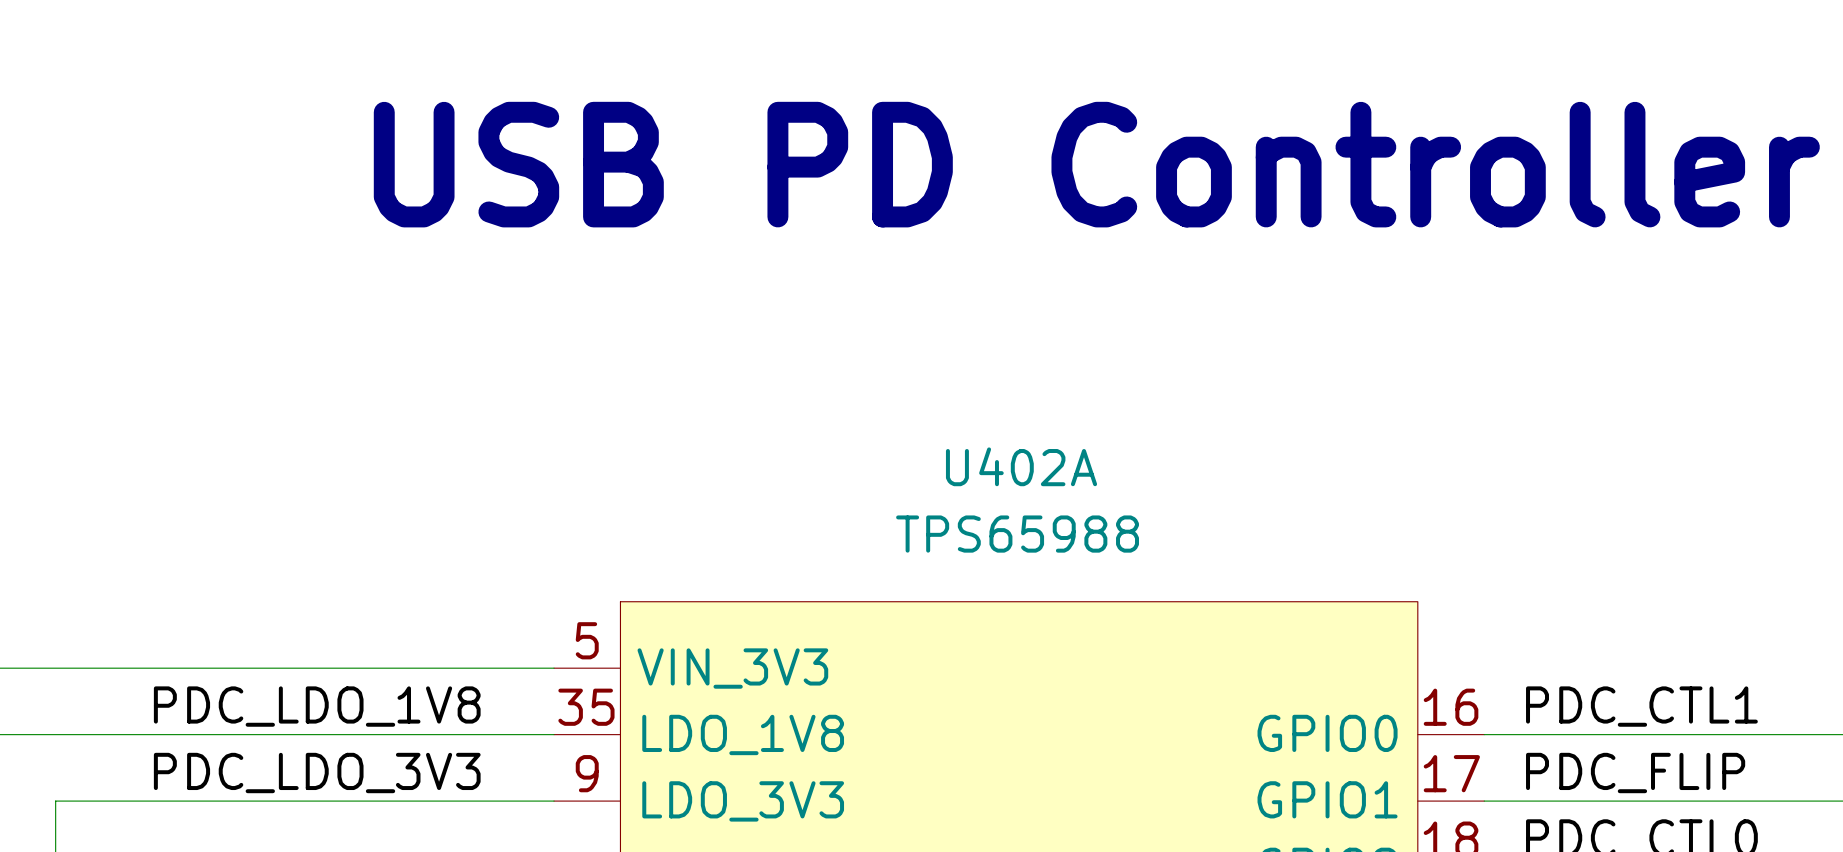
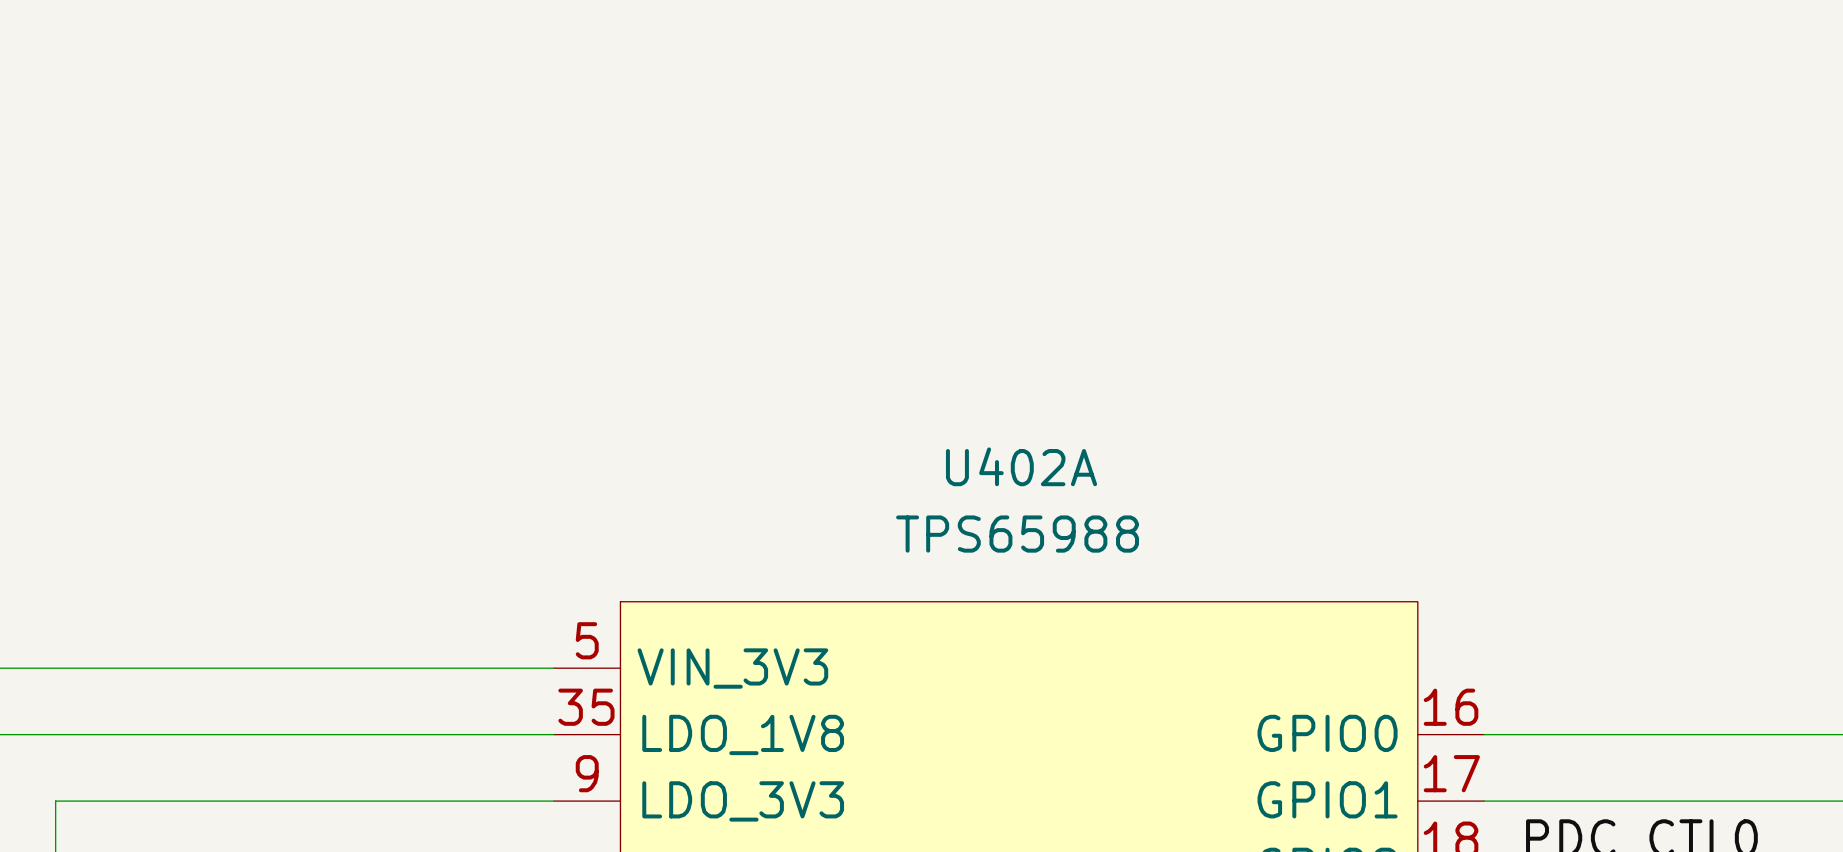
text: USB PD Controller (1096, 164) -> none
label: PDC_LDO_1V8 (317, 706) -> none
label: PDC_CTL1 (1641, 706) -> none
label: PDC_LDO_3V3 (317, 773) -> none
label: PDC_FLIP (1635, 773) -> none

